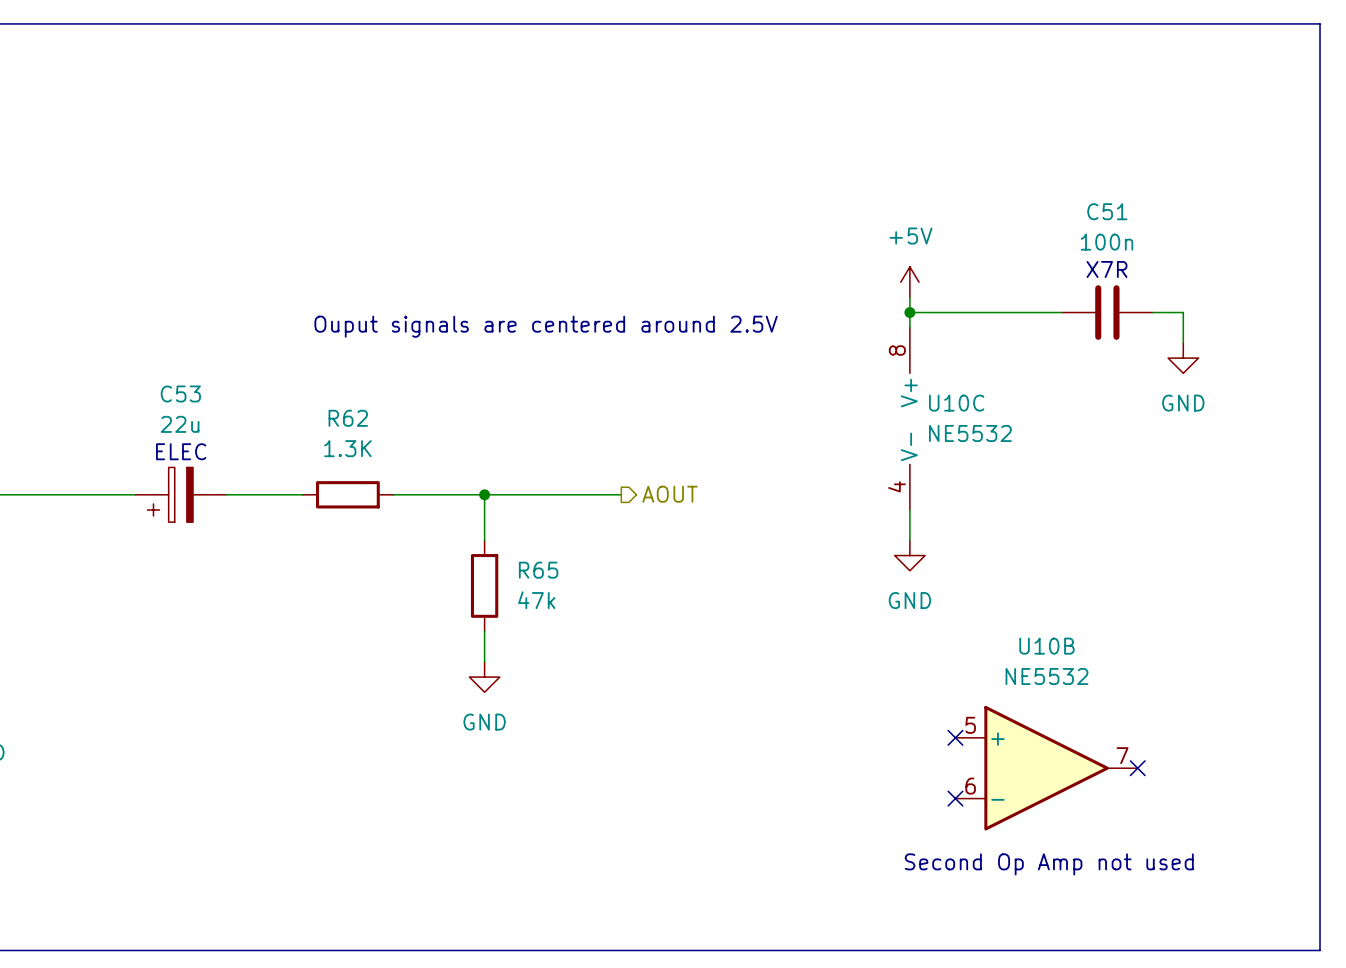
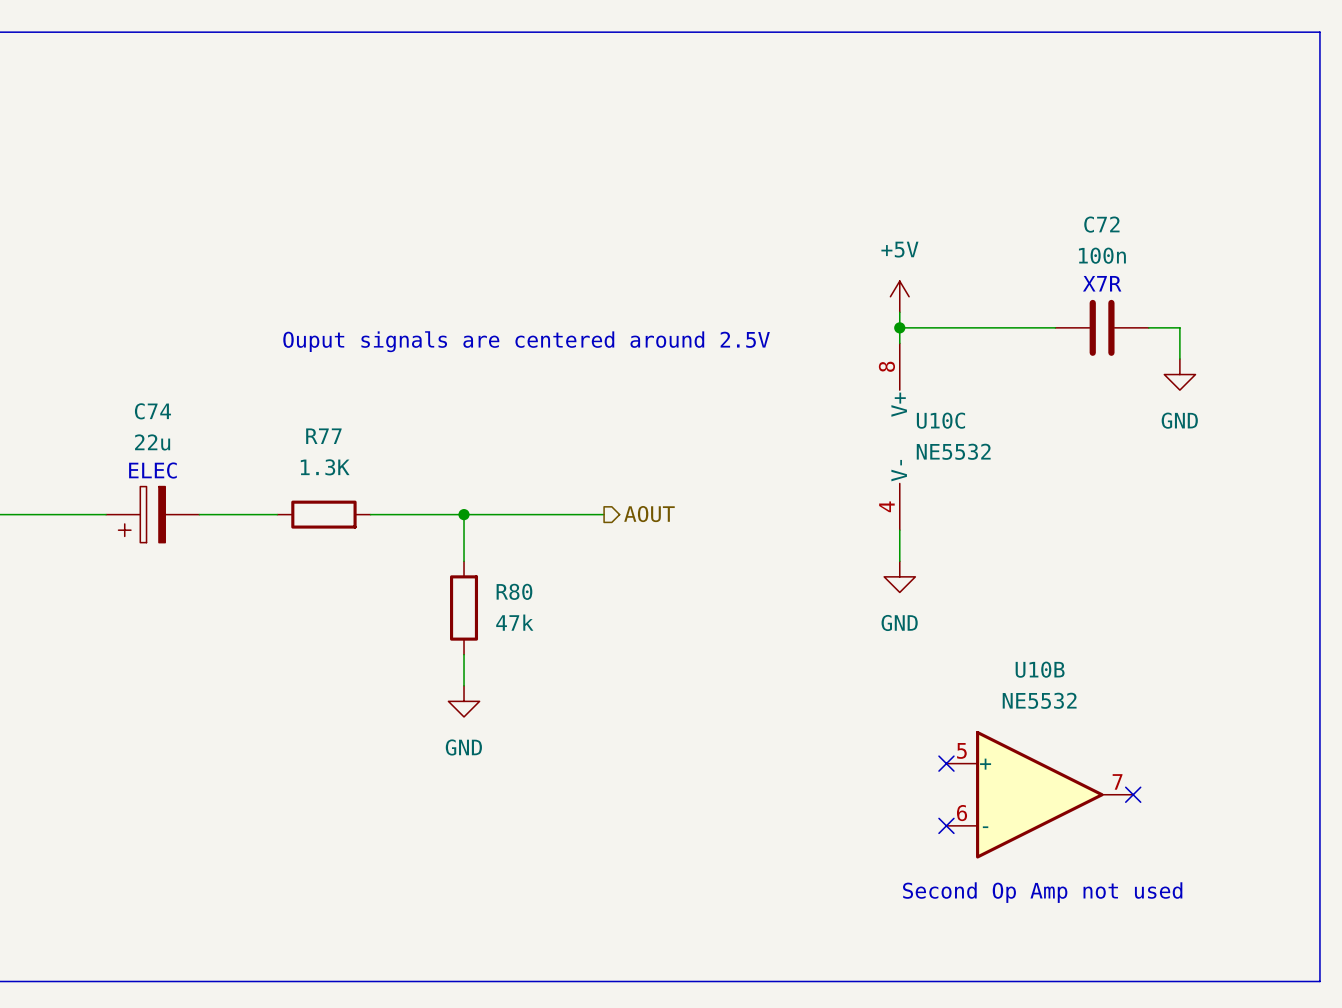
C51 name: C51 (1107, 211) -> C72 (1101, 224)
C53 name: C53 (180, 393) -> C74 (152, 411)
R62 name: R62 (348, 418) -> R77 (323, 436)
R65 name: R65 (538, 570) -> R80 (514, 591)

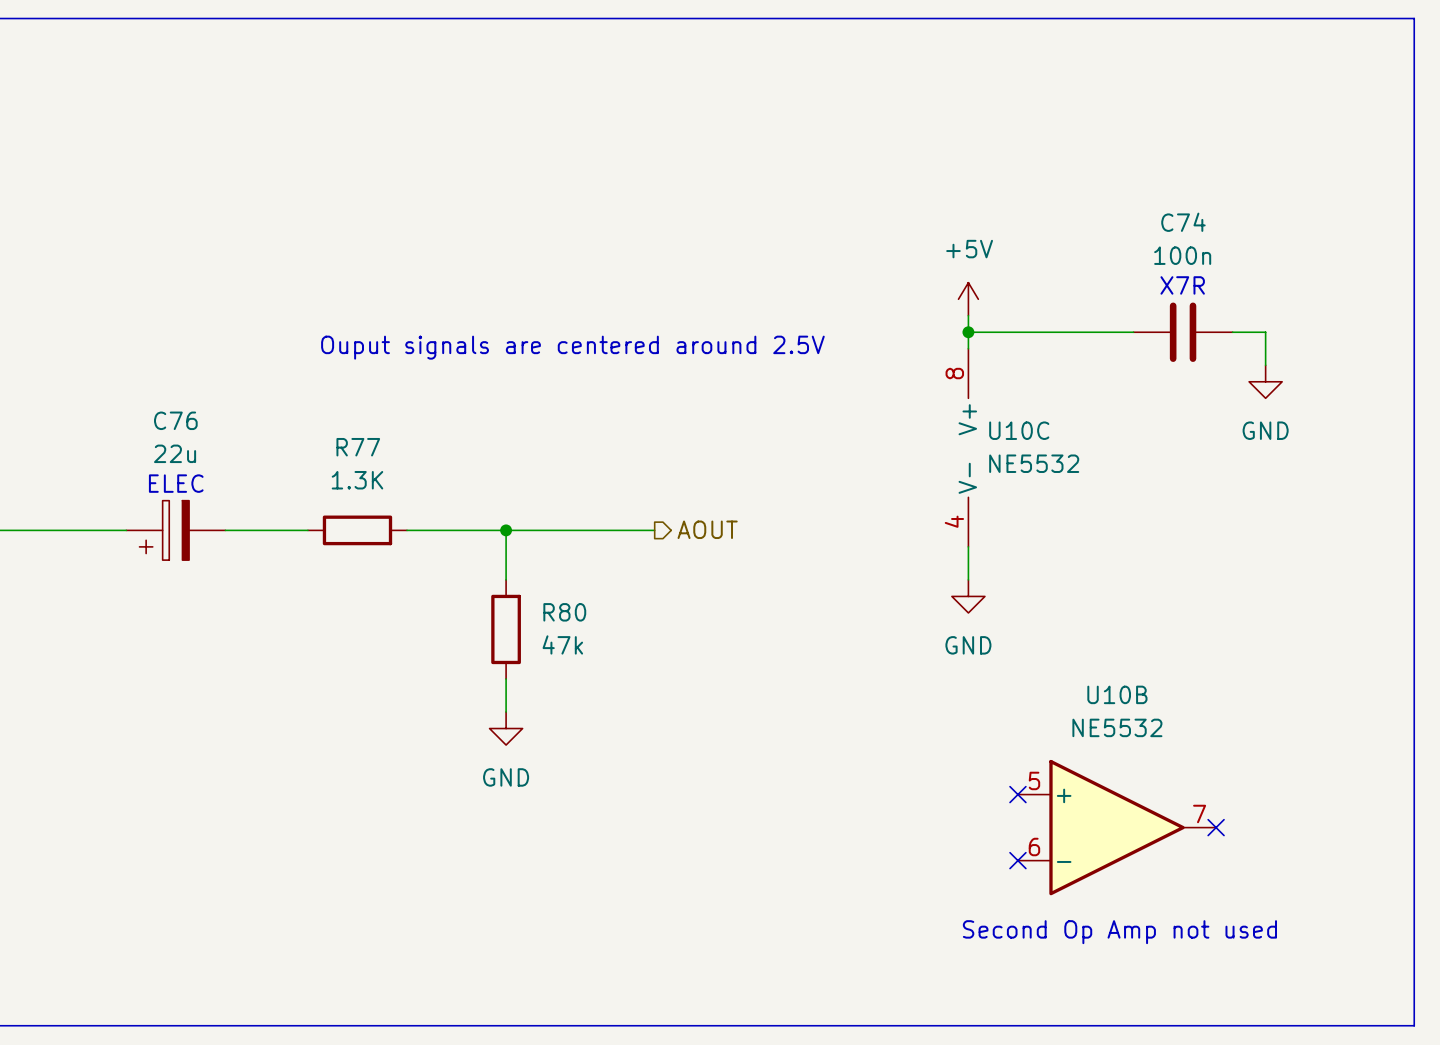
C72 name: C72 (1101, 224) -> C74 (1183, 222)
C74 name: C74 (152, 411) -> C76 (175, 420)

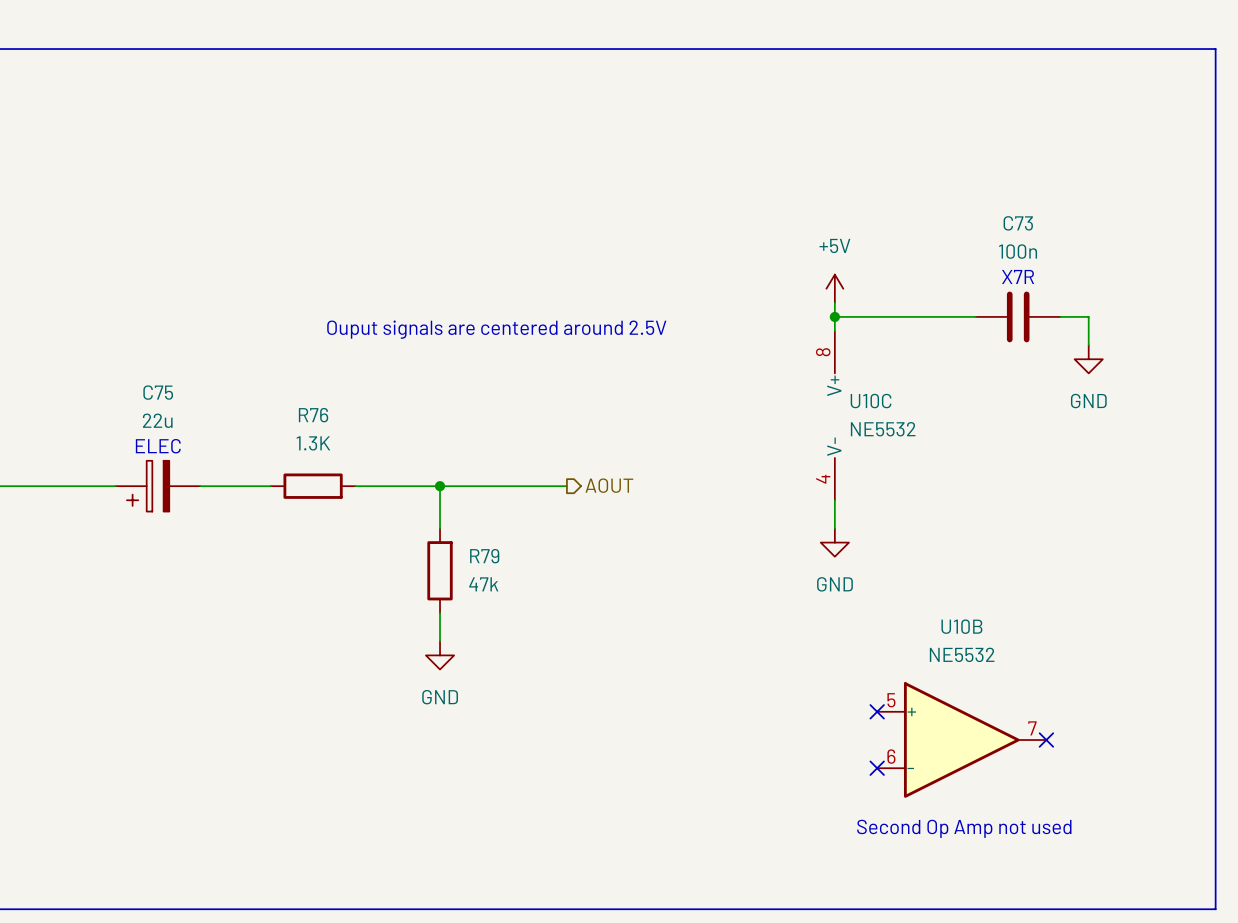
C74 name: C74 (1183, 222) -> C73 (1018, 223)
C76 name: C76 (175, 420) -> C75 (158, 392)
R77 name: R77 (358, 447) -> R76 (313, 415)
R80 name: R80 (564, 612) -> R79 (484, 556)

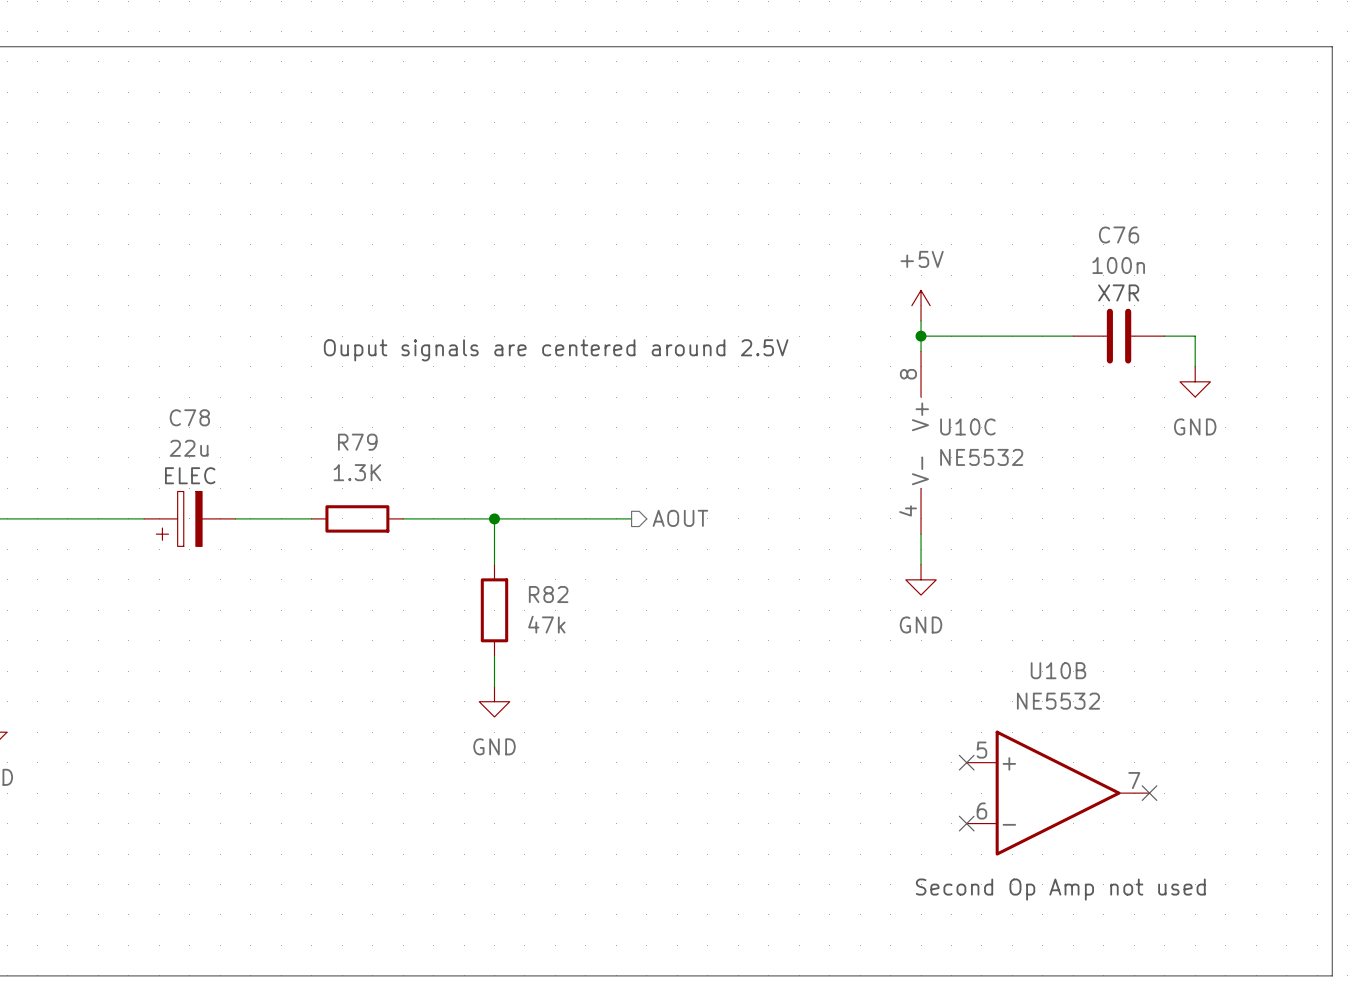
C73 name: C73 (1018, 223) -> C76 (1119, 235)
C75 name: C75 (158, 392) -> C78 (189, 417)
R76 name: R76 (313, 415) -> R79 (357, 442)
R79 name: R79 (484, 556) -> R82 (548, 594)

